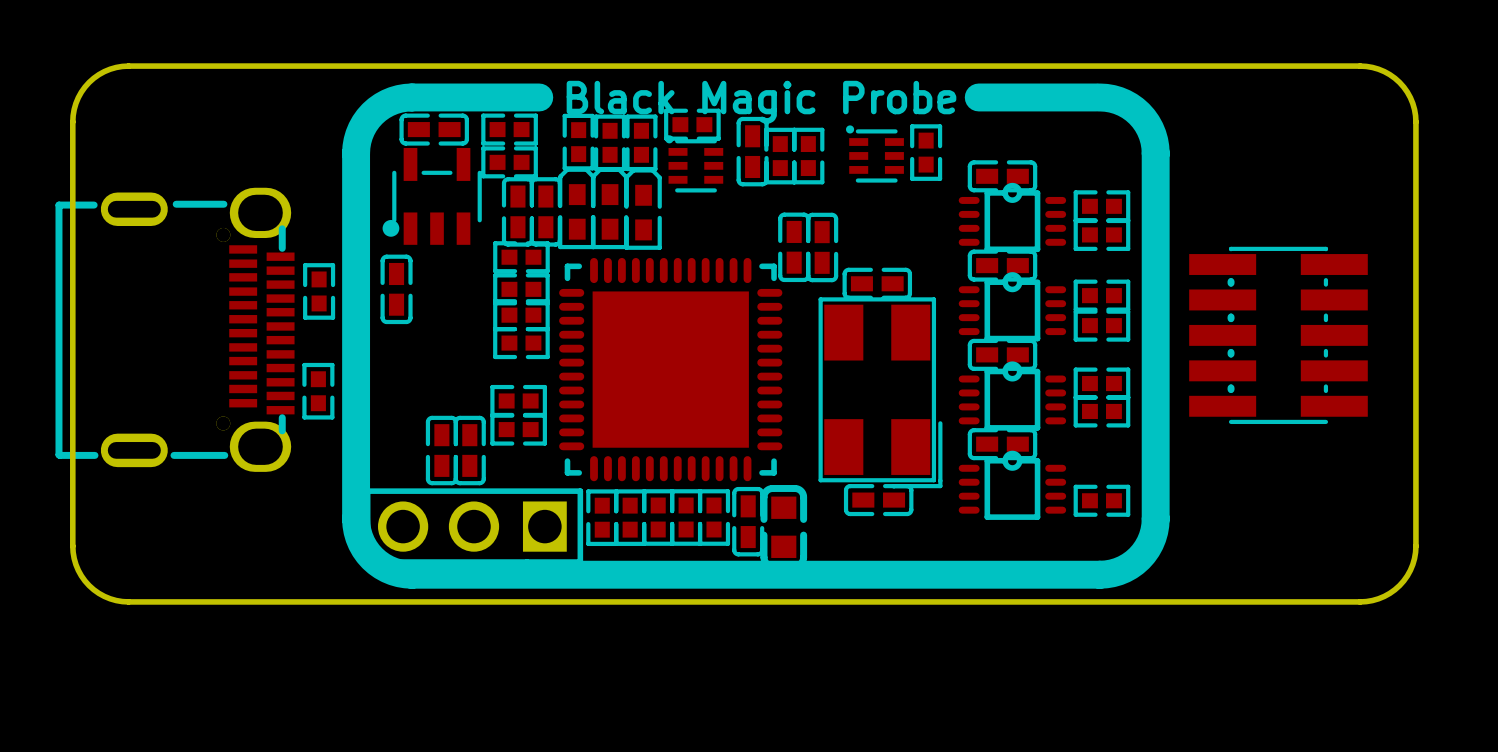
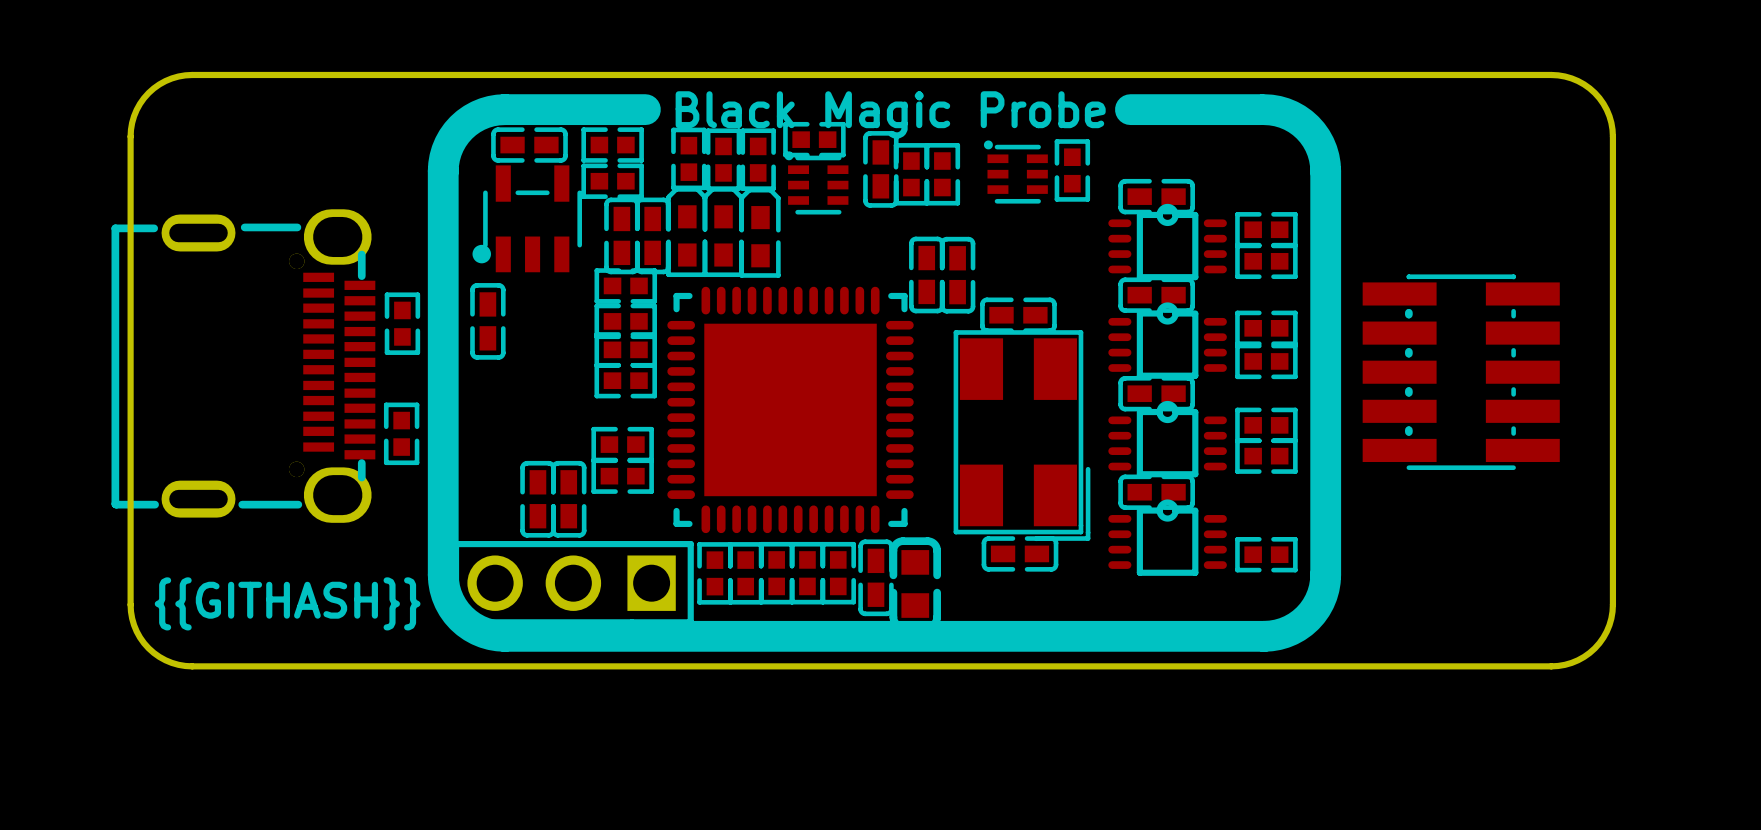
text: none -> {{GITHASH}} (287, 603)

